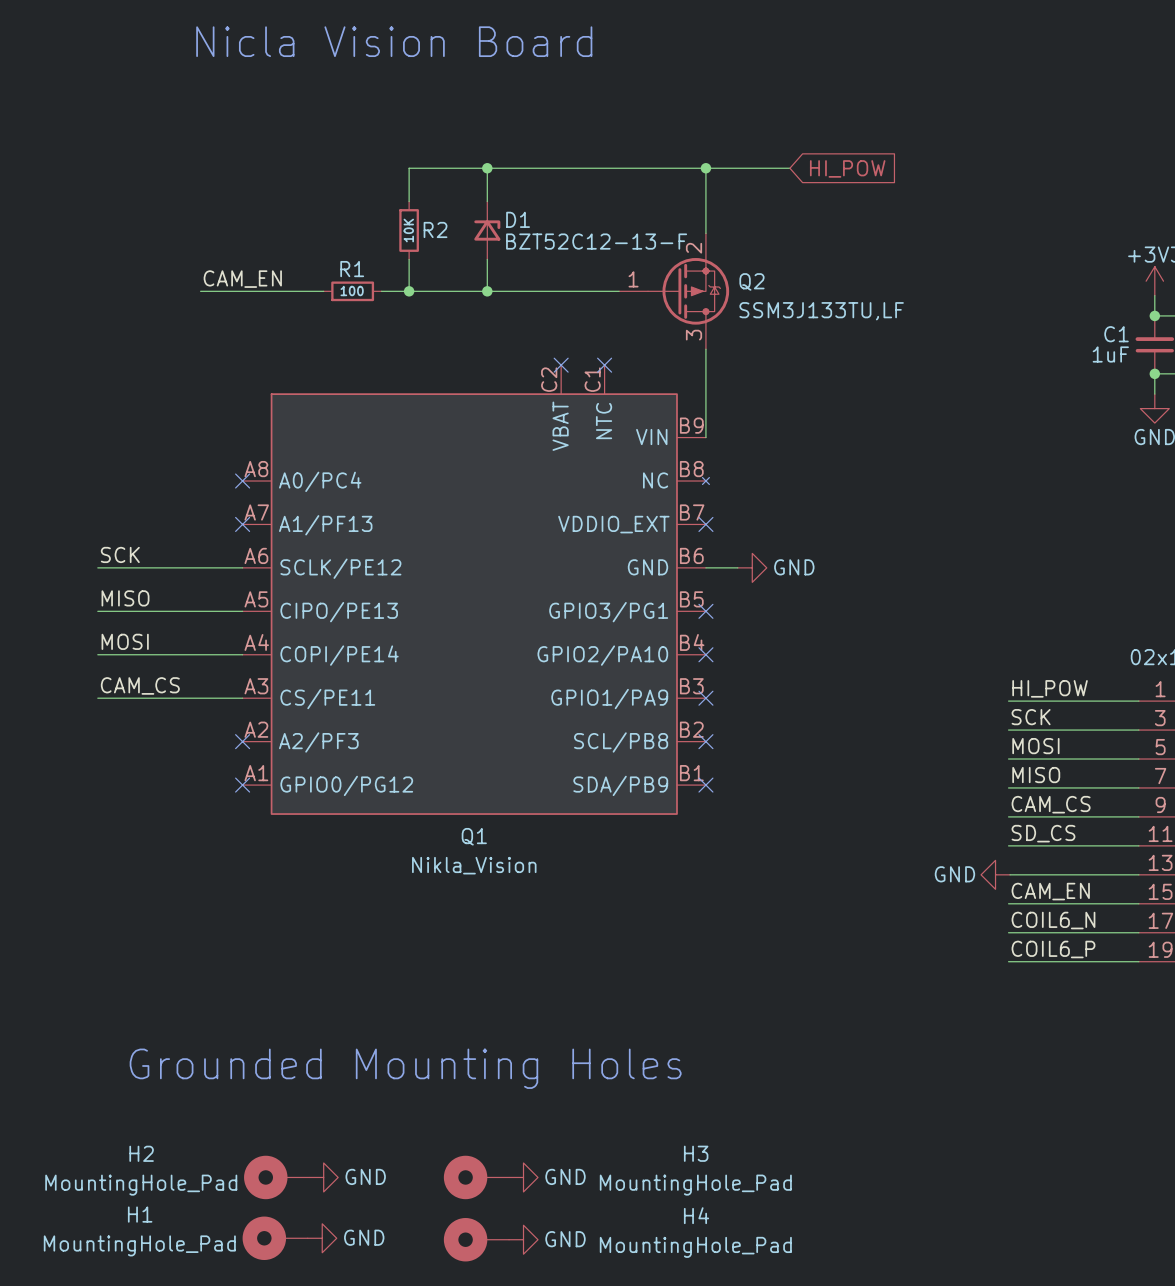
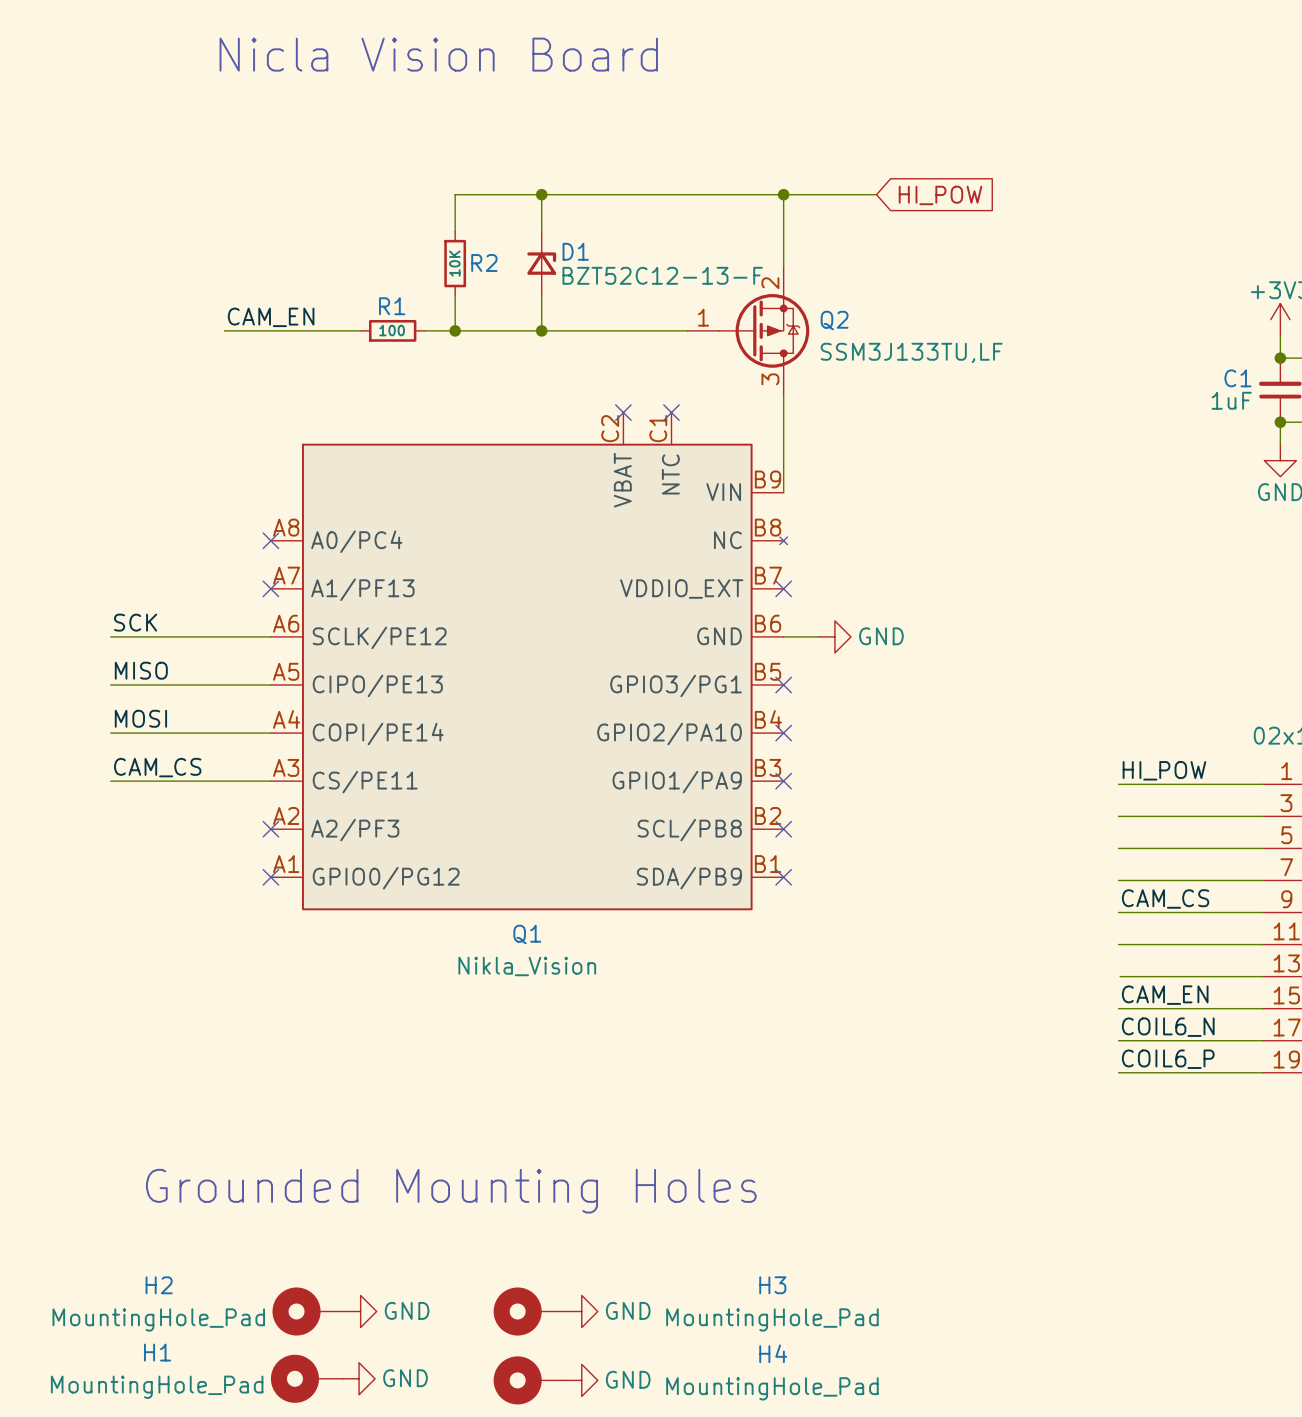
label: SCK (1031, 717) -> none
label: MOSI (1035, 746) -> none
label: MISO (1036, 775) -> none
label: SD_CS (1043, 833) -> none
power symbol: GND (995, 874) -> none

